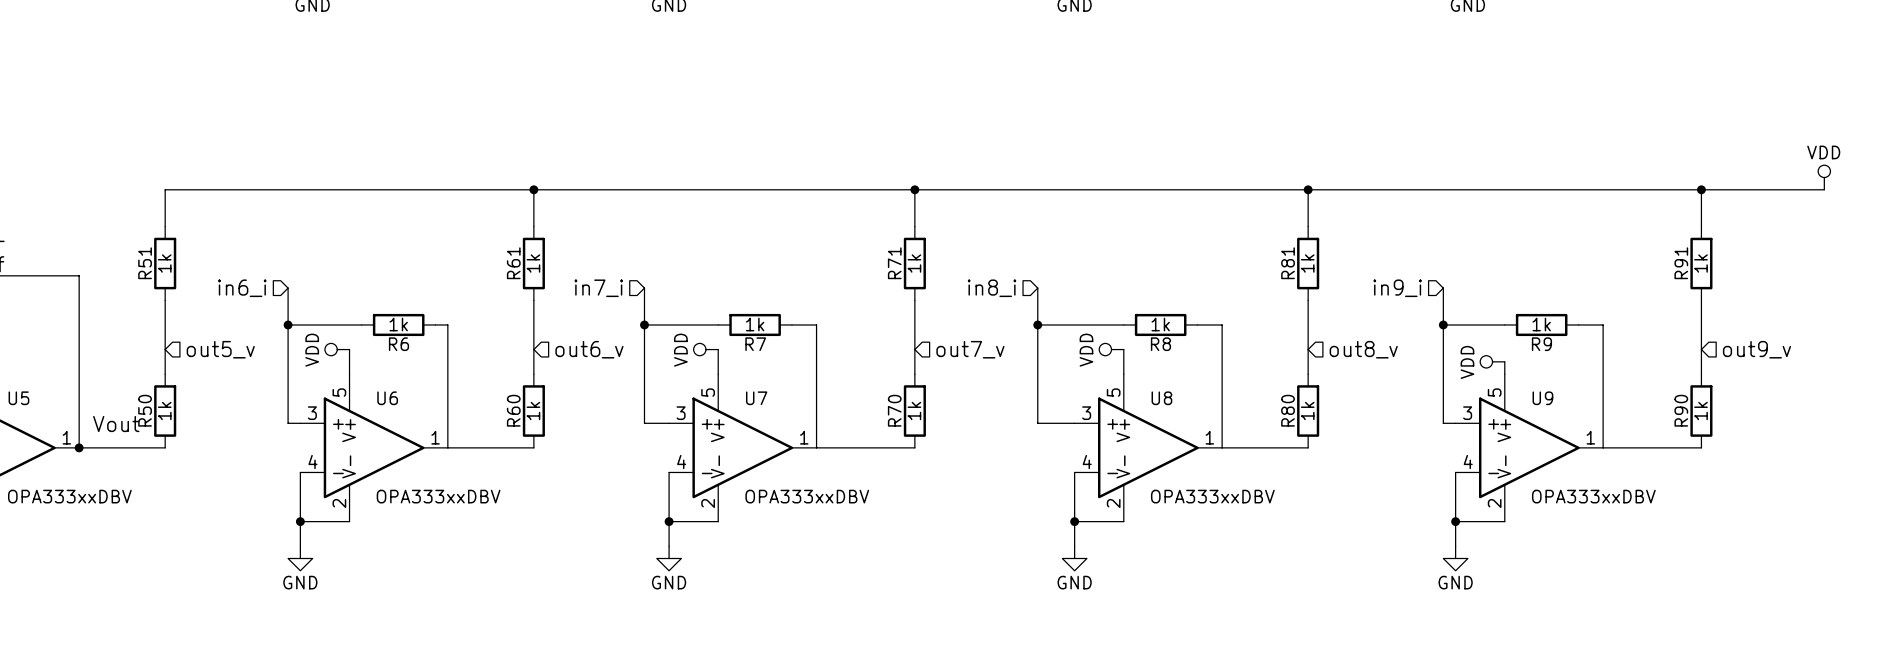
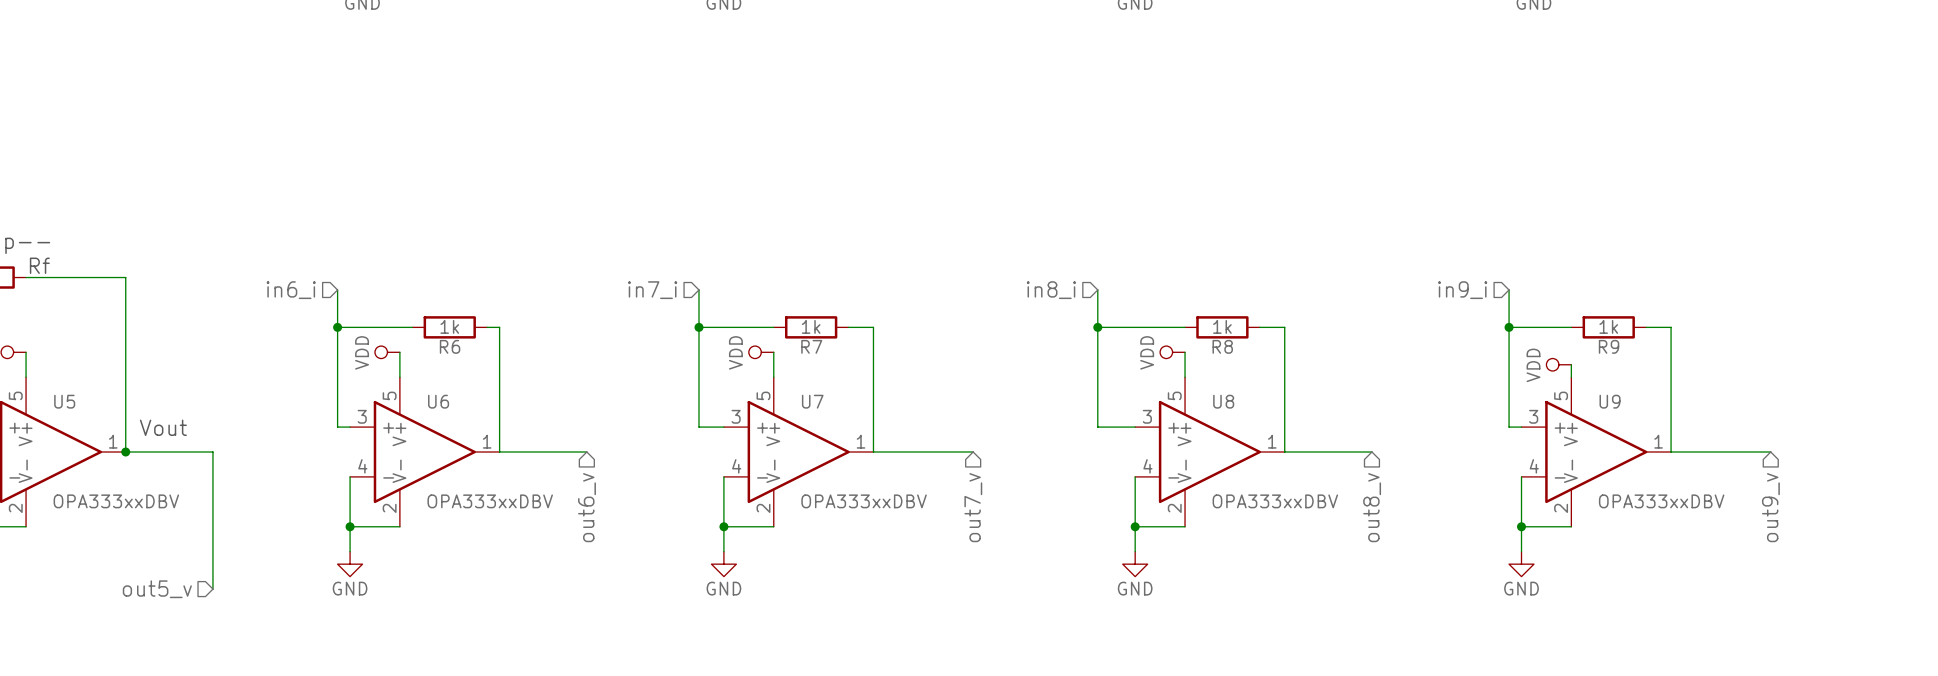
power symbol: VDD (1824, 177) -> none
wire: (533, 189) (533, 226) -> none
junction: (533, 189) -> none
wire: (914, 189) (914, 226) -> none
junction: (914, 189) -> none
wire: (1308, 189) (1308, 226) -> none
junction: (1308, 189) -> none
wire: (1701, 189) (1701, 226) -> none
junction: (1701, 189) -> none
wire: (1824, 189) (165, 189) (165, 226) -> none
R51: 1k (165, 263) -> none
R61: 1k (533, 263) -> none
R71: 1k (914, 263) -> none
R81: 1k (1308, 263) -> none
R91: 1k (1701, 263) -> none
wire: (165, 300) (165, 374) -> none
wire: (533, 300) (533, 374) -> none
wire: (914, 300) (914, 374) -> none
wire: (1308, 300) (1308, 374) -> none
wire: (1701, 300) (1701, 374) -> none
hierarchical label rotation: 0° (220, 349) -> 180° (157, 589)
hierarchical label position: out5_v (220, 349) -> out5_v (157, 589)
hierarchical label rotation: 0° (589, 349) -> 90° clockwise (586, 507)
hierarchical label position: out6_v (589, 349) -> out6_v (586, 507)
hierarchical label rotation: 0° (970, 349) -> 90° clockwise (973, 507)
hierarchical label position: out7_v (970, 349) -> out7_v (973, 507)
hierarchical label rotation: 0° (1363, 349) -> 90° clockwise (1372, 507)
hierarchical label position: out8_v (1363, 349) -> out8_v (1372, 507)
hierarchical label rotation: 0° (1757, 349) -> 90° clockwise (1770, 507)
hierarchical label position: out9_v (1757, 349) -> out9_v (1770, 507)
R50: 1k (165, 411) -> none
R60: 1k (533, 411) -> none
R70: 1k (914, 411) -> none
R80: 1k (1308, 411) -> none
R90: 1k (1701, 411) -> none
wire: none -> (212, 452) (212, 589)

